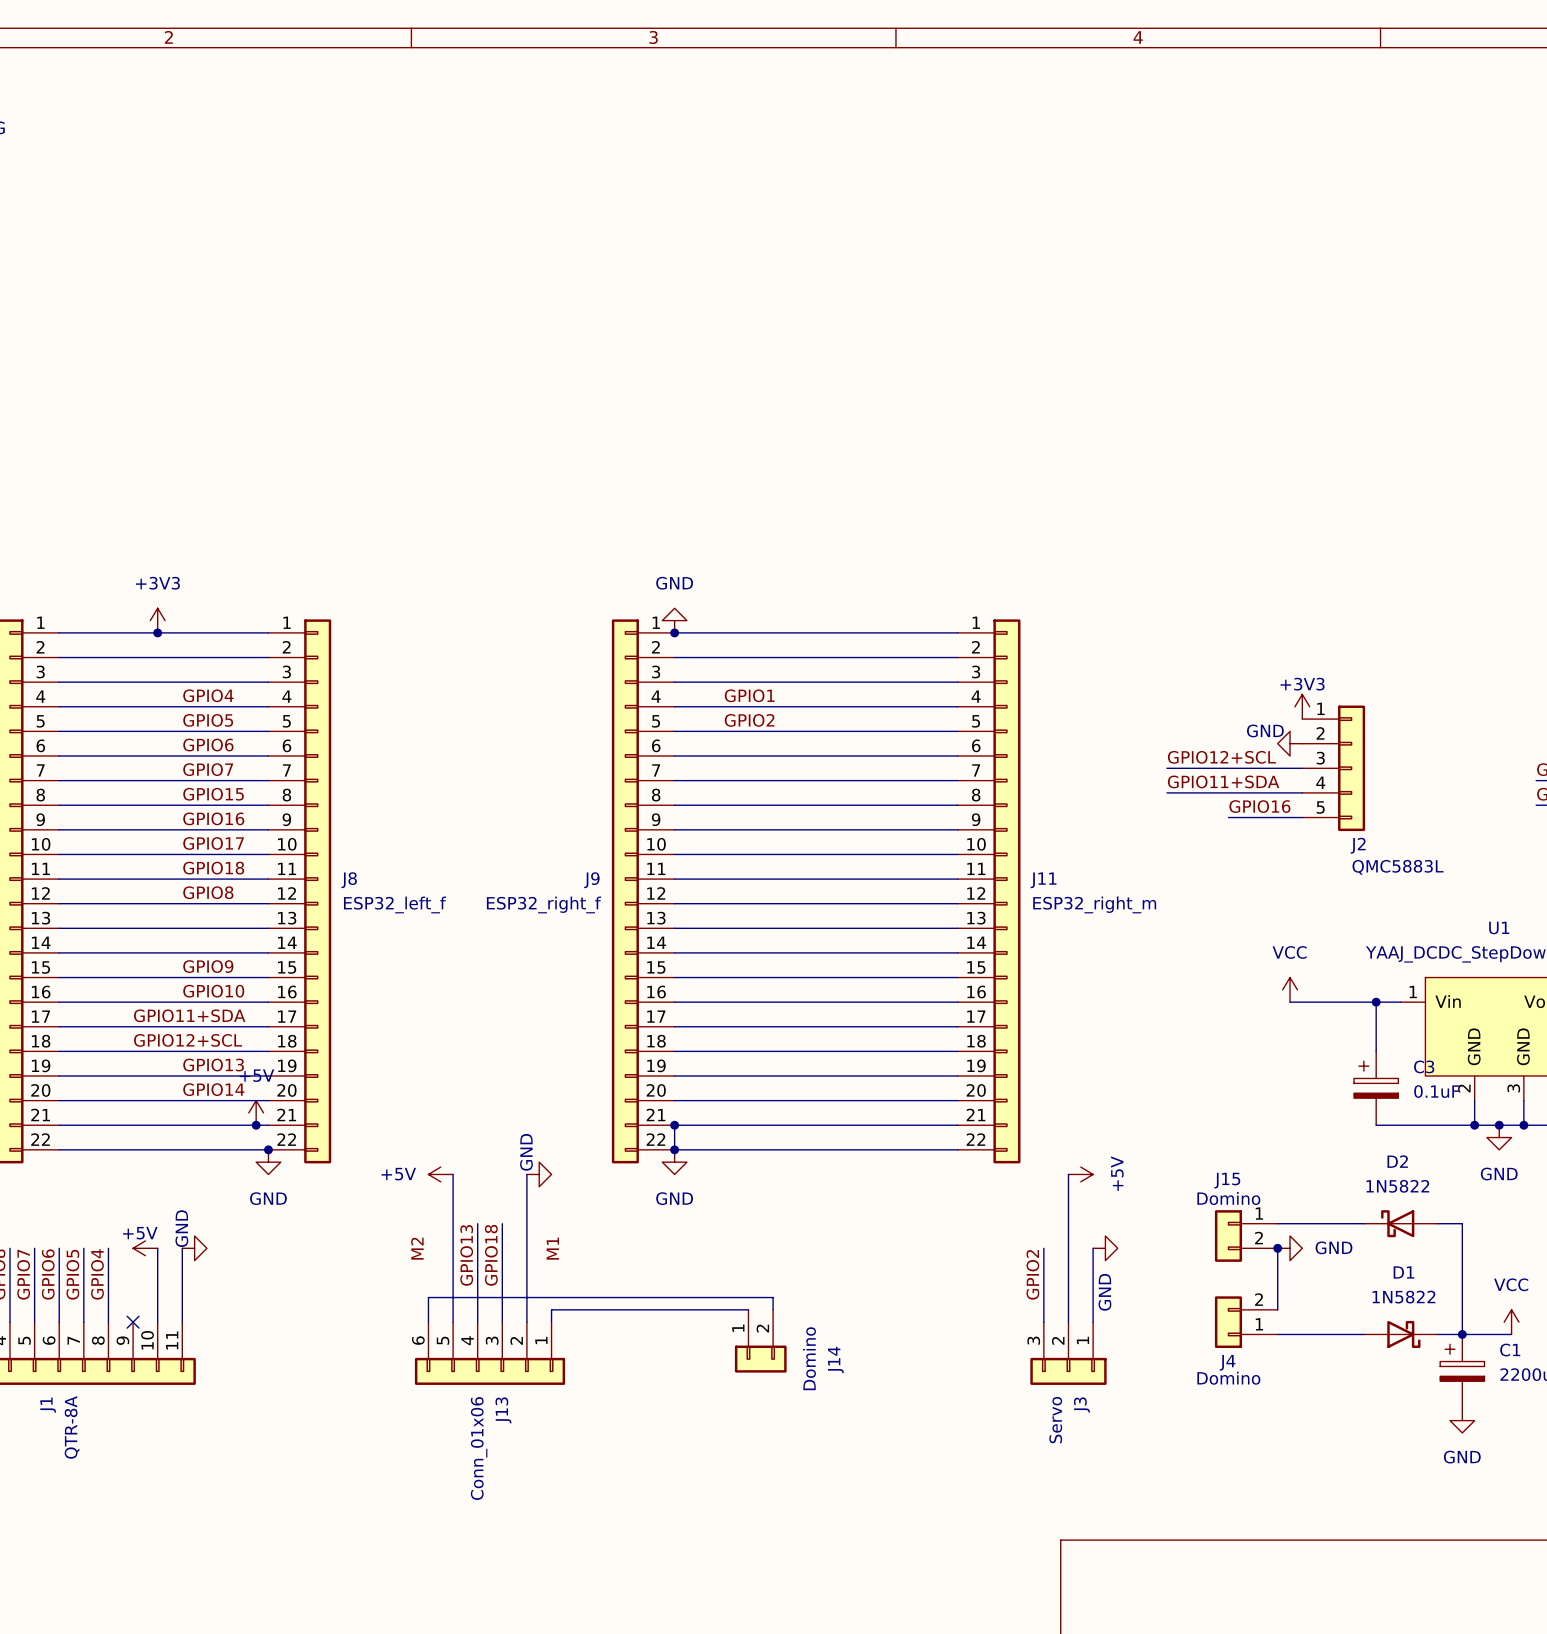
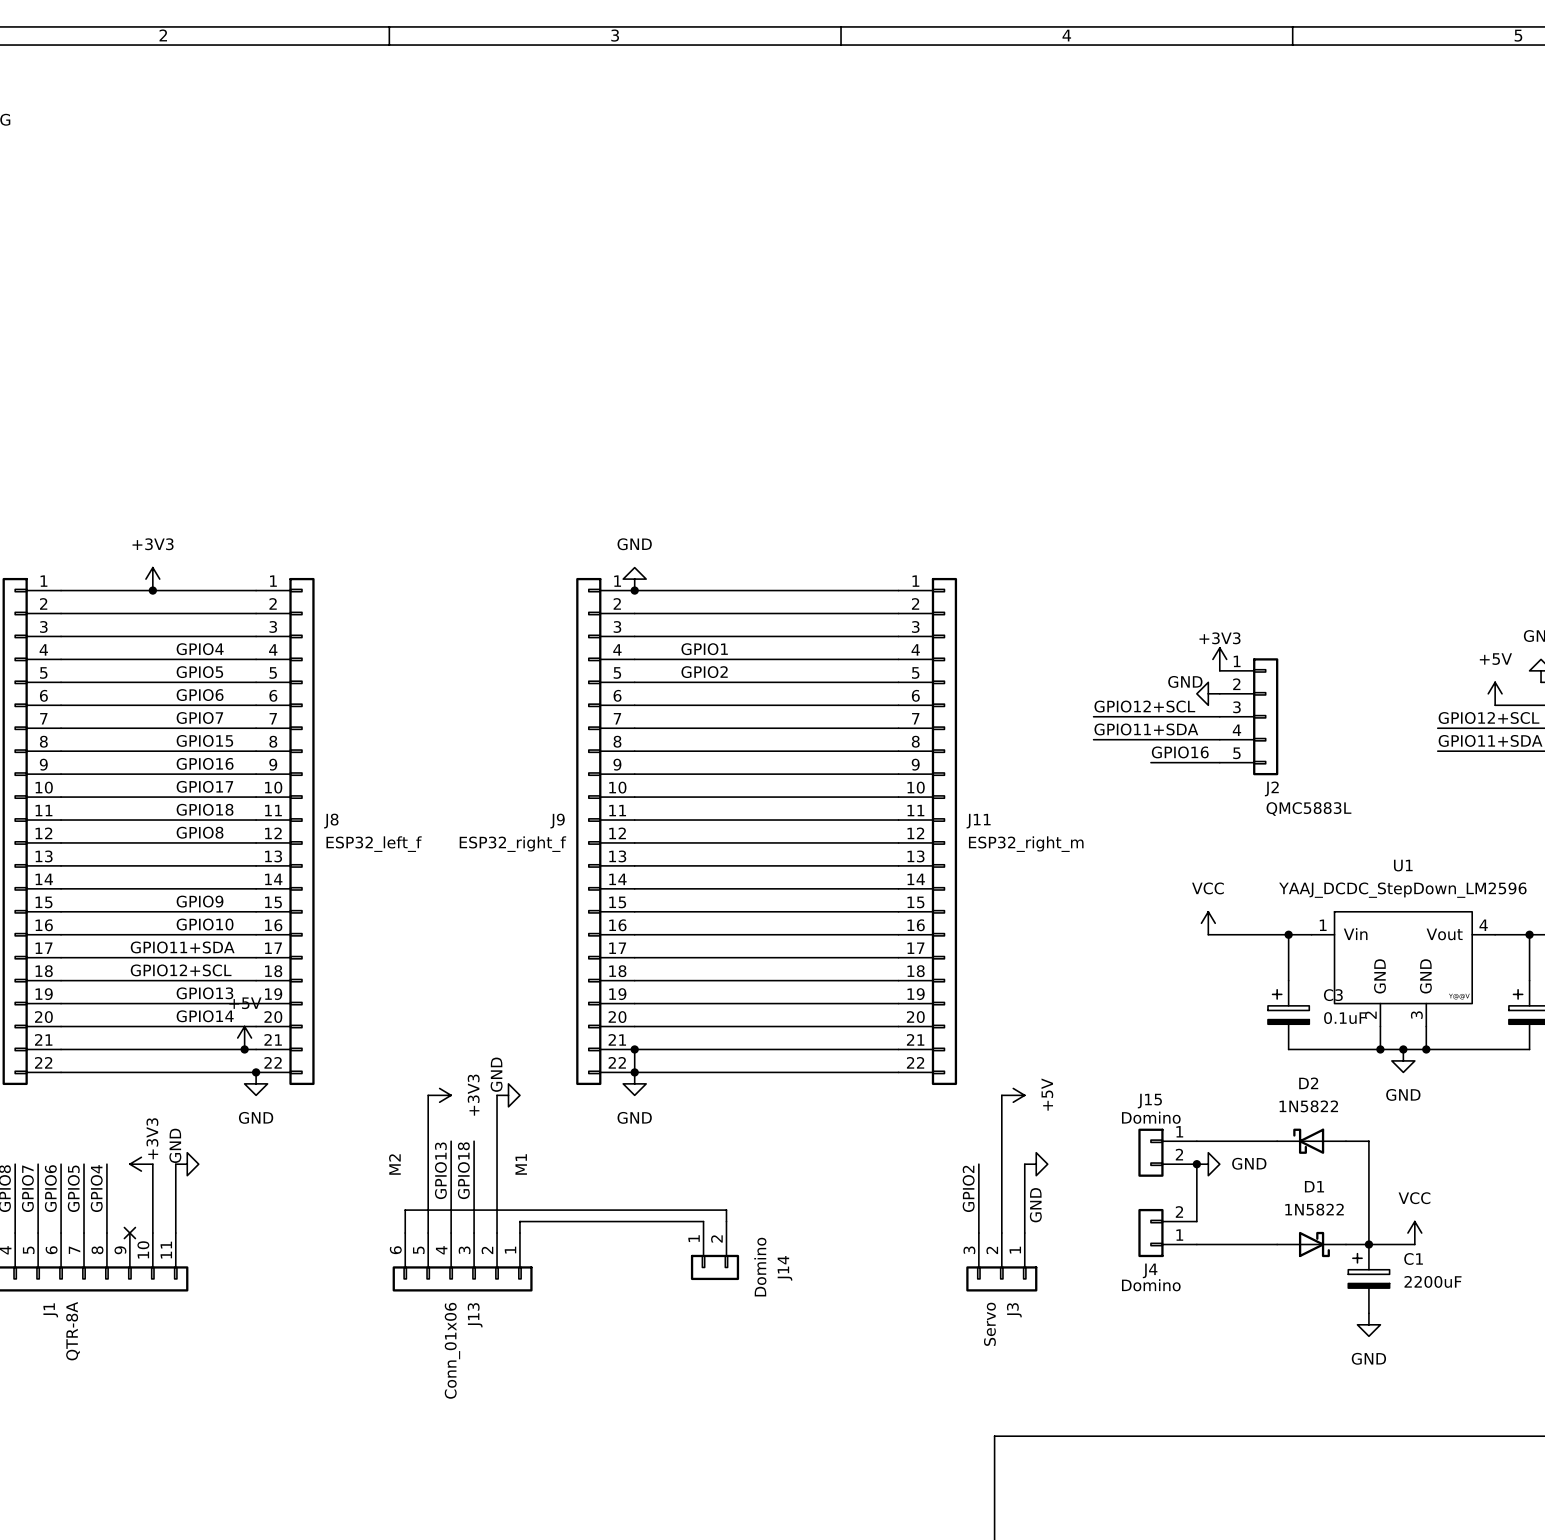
power symbol: +5V (440, 1174) -> none
power symbol: none -> +3V3 (439, 1095)
power symbol: +5V (145, 1248) -> +3V3 (141, 1164)

